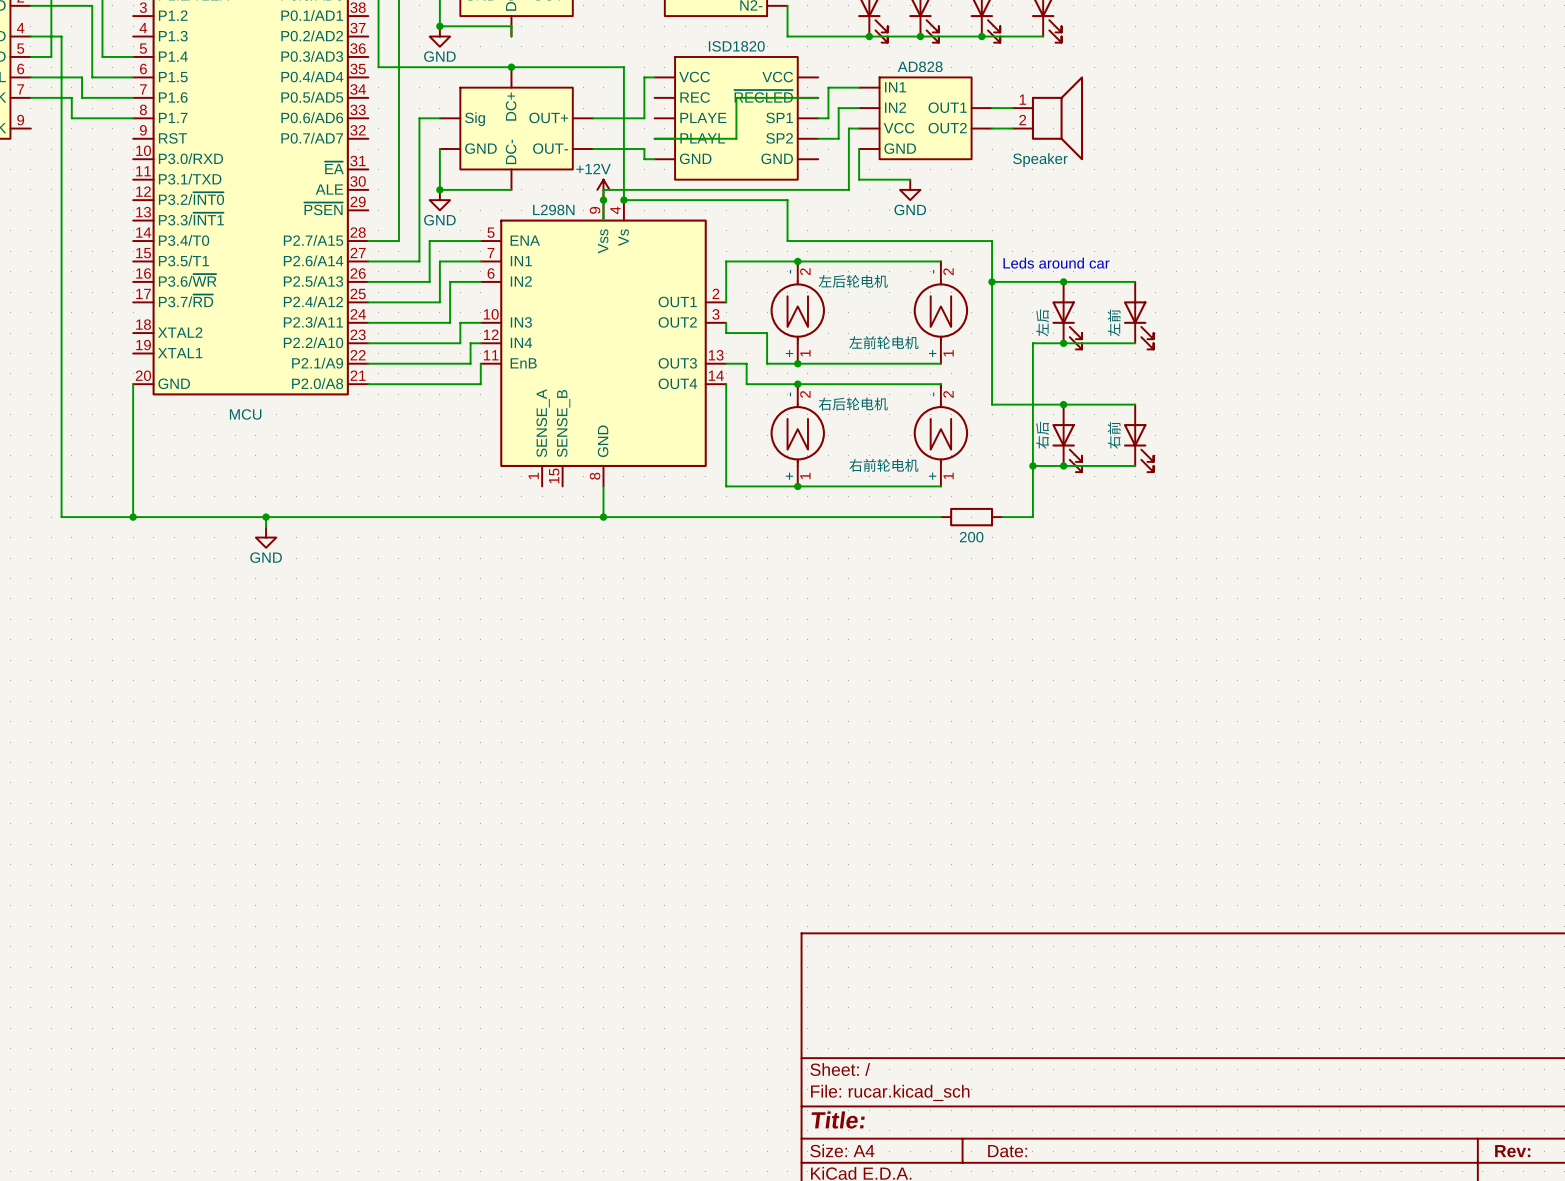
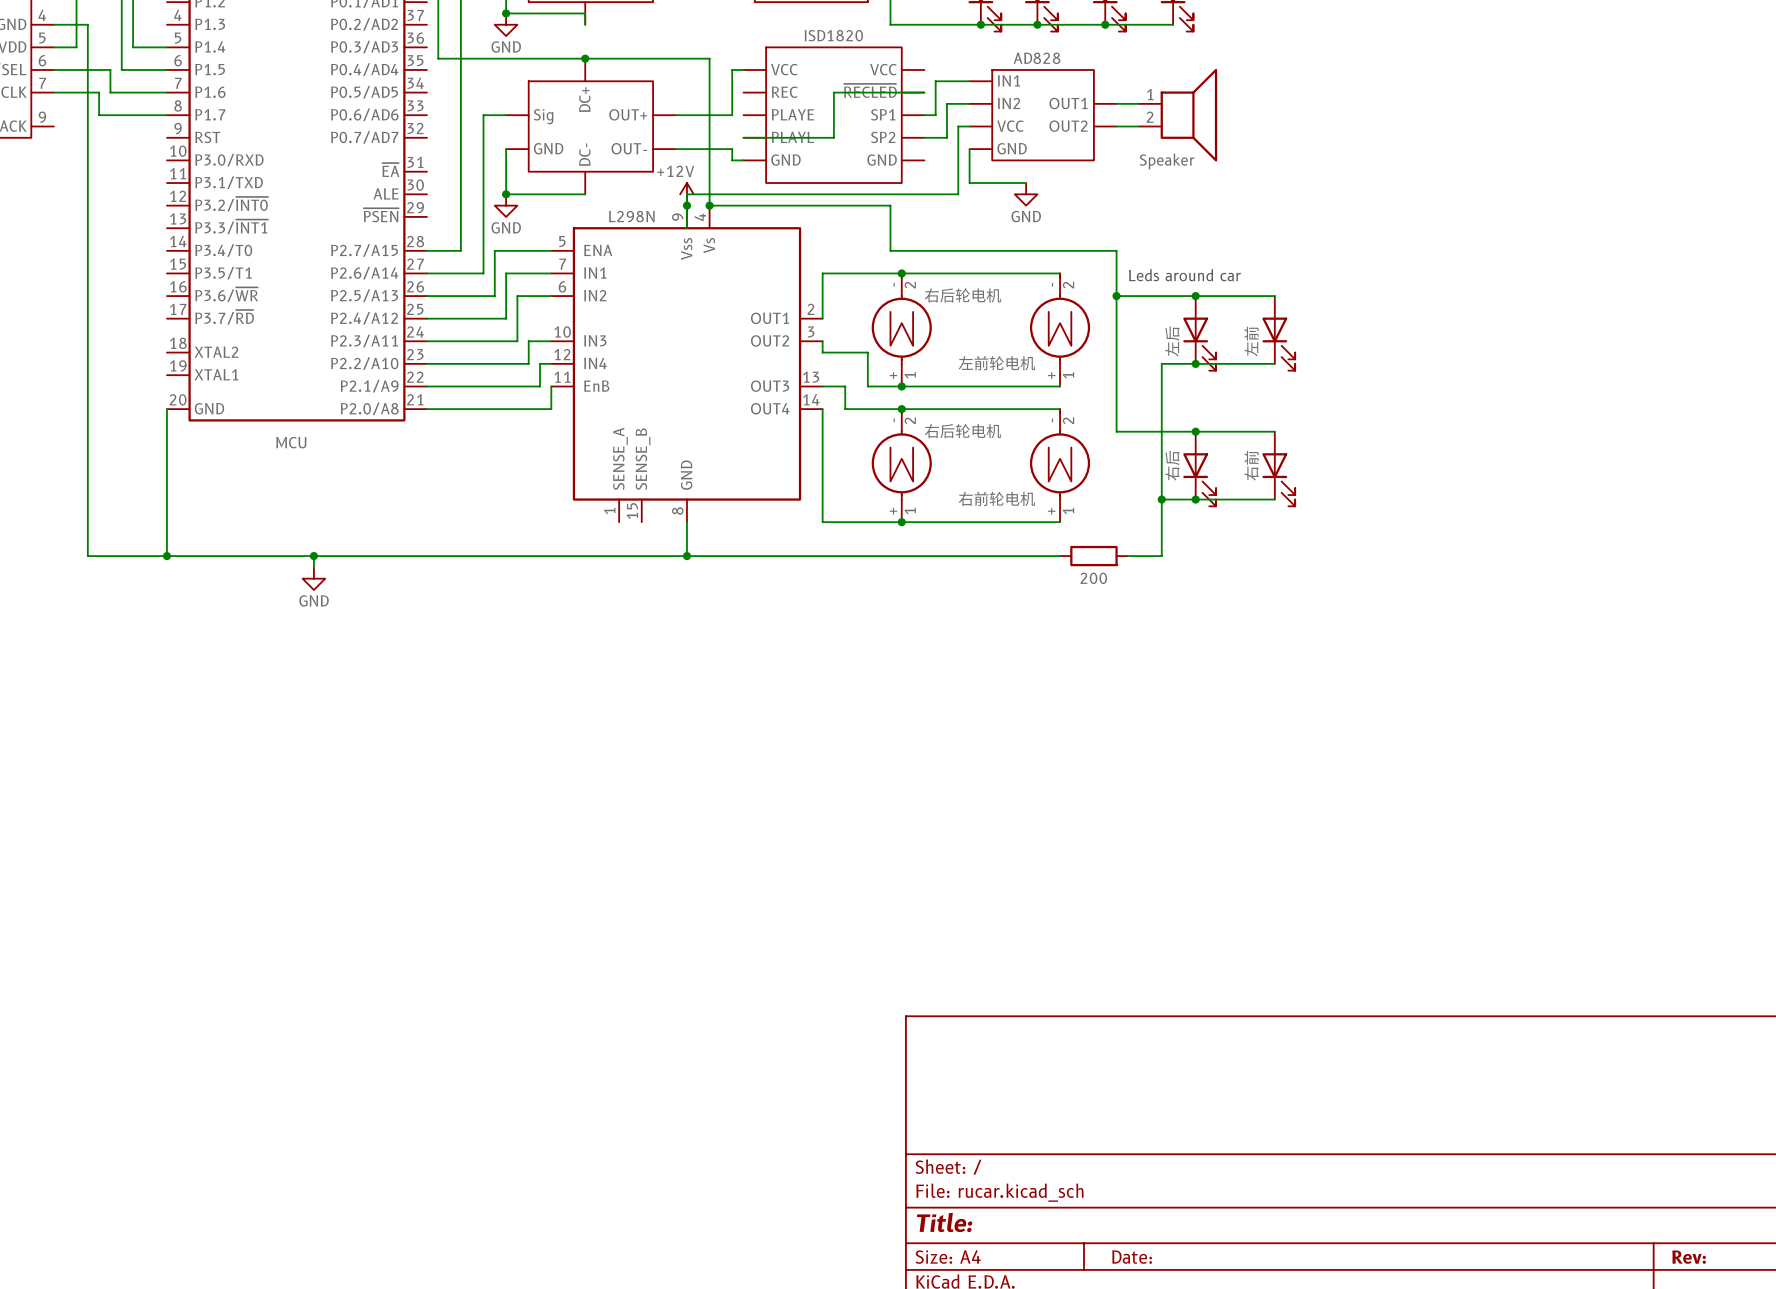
part value: 左后轮电机 (853, 281) -> 右后轮电机 (963, 295)

